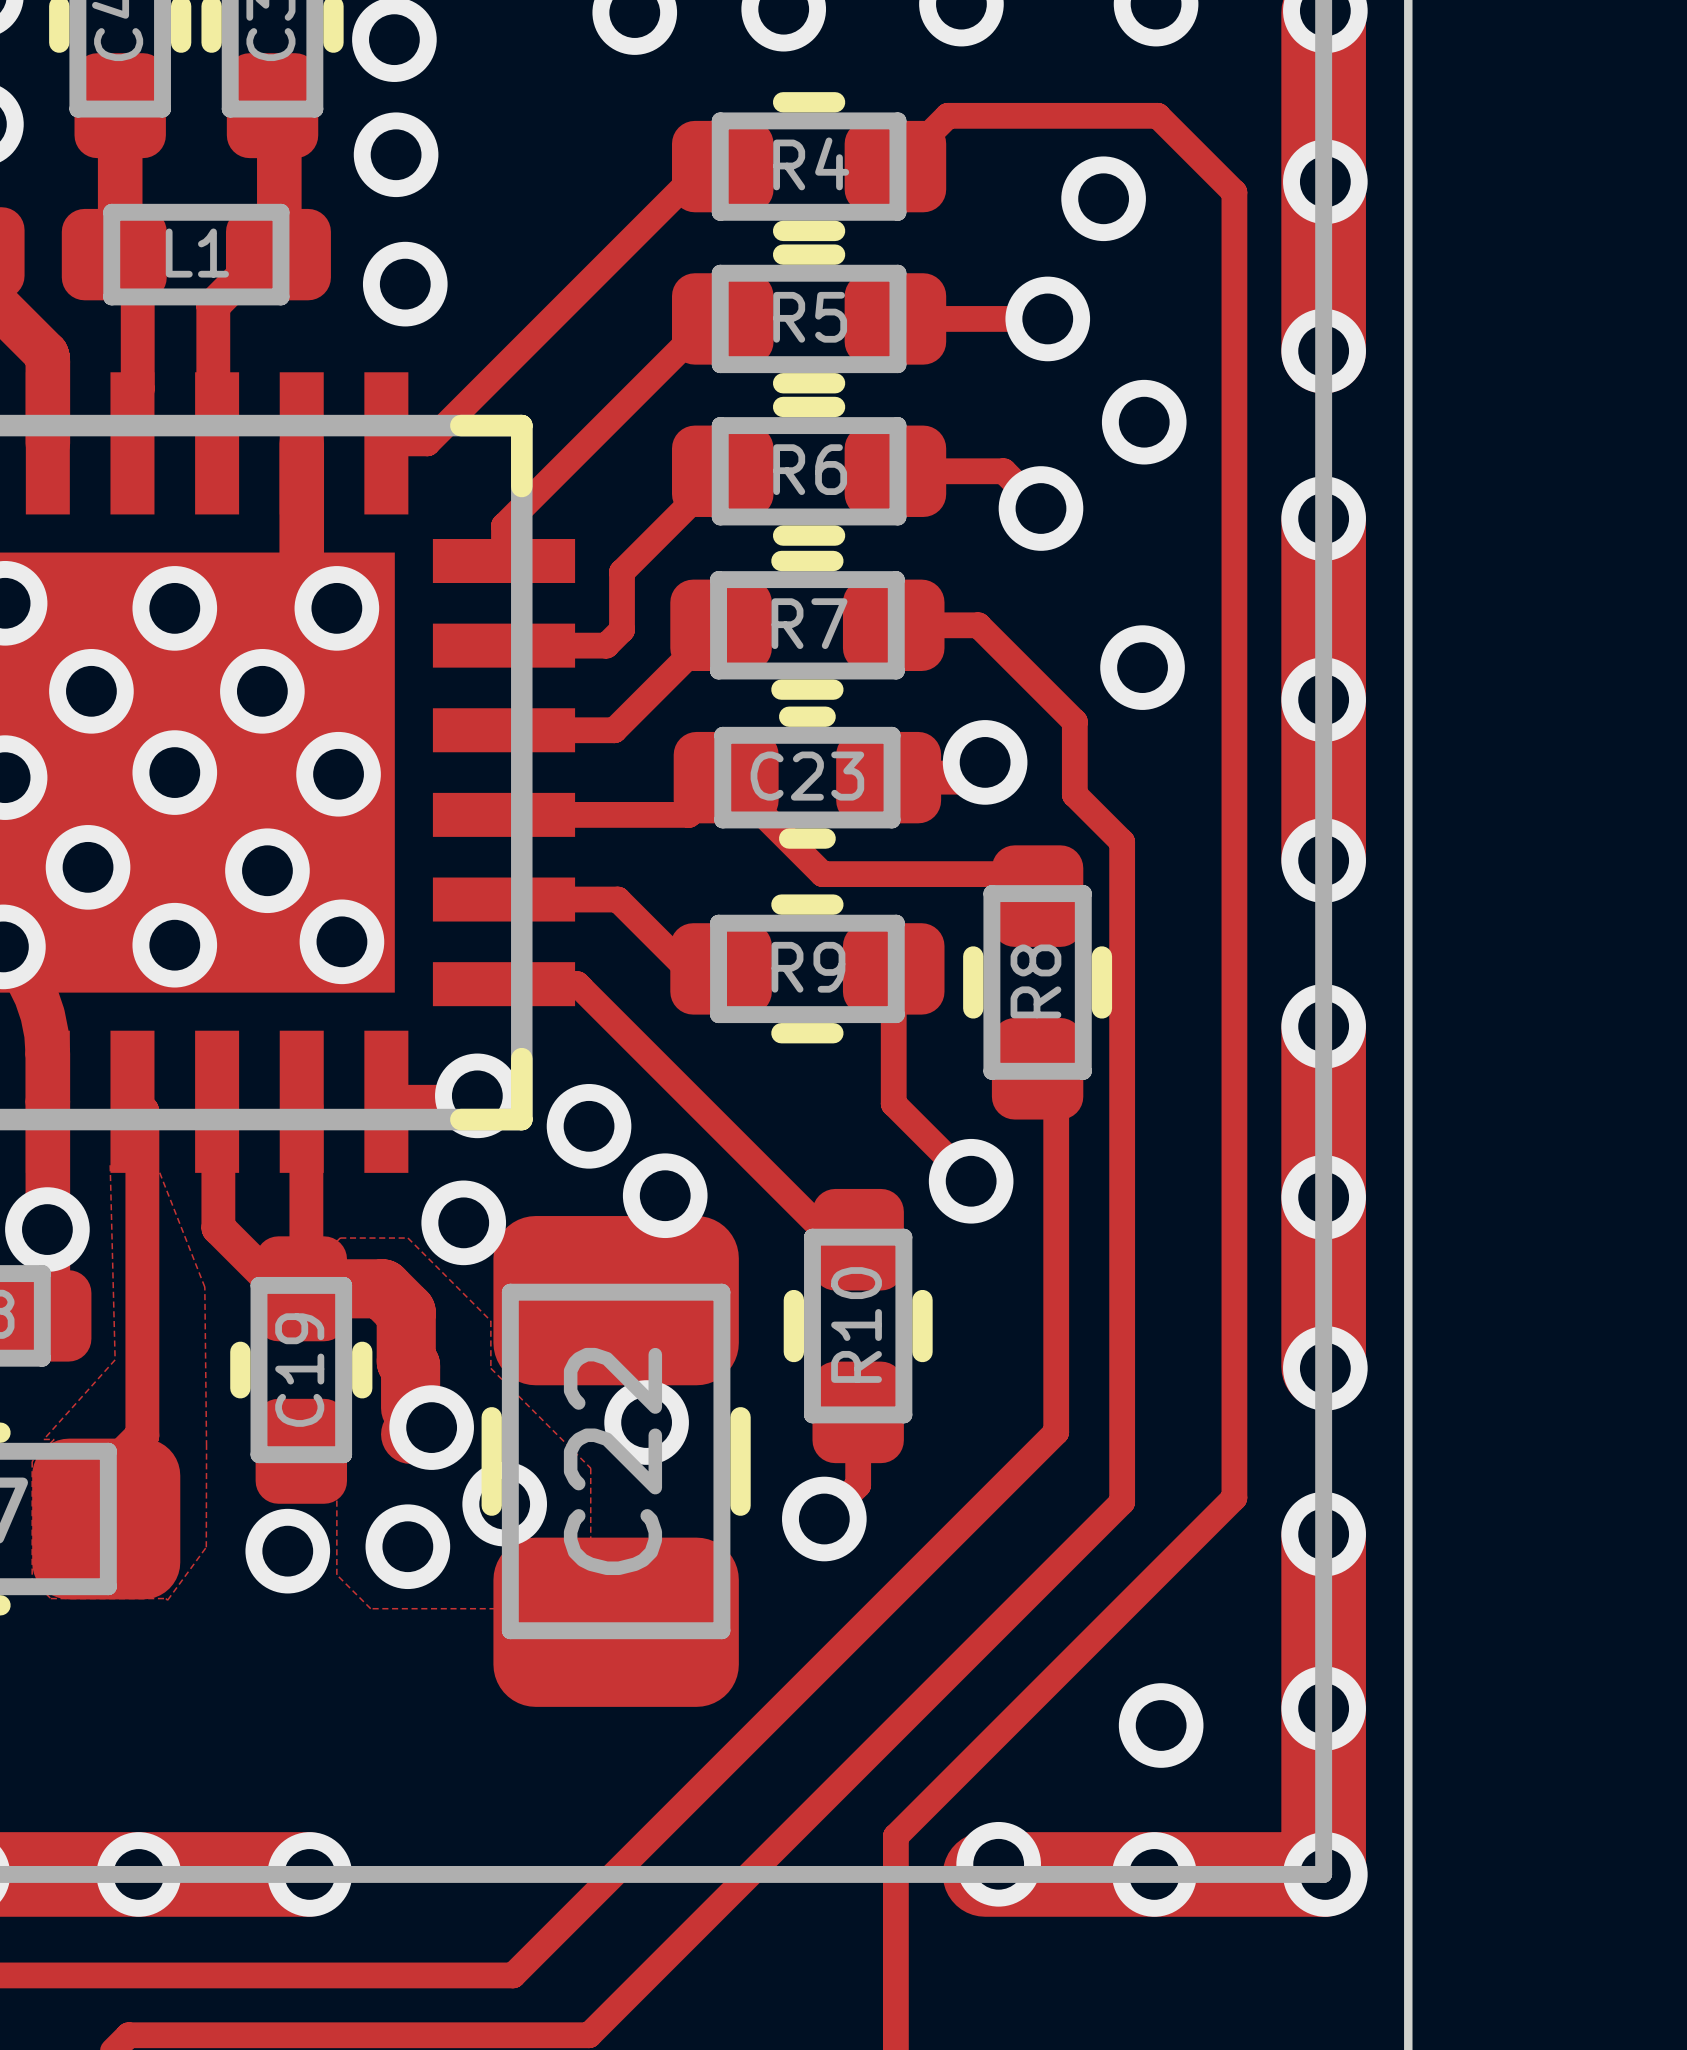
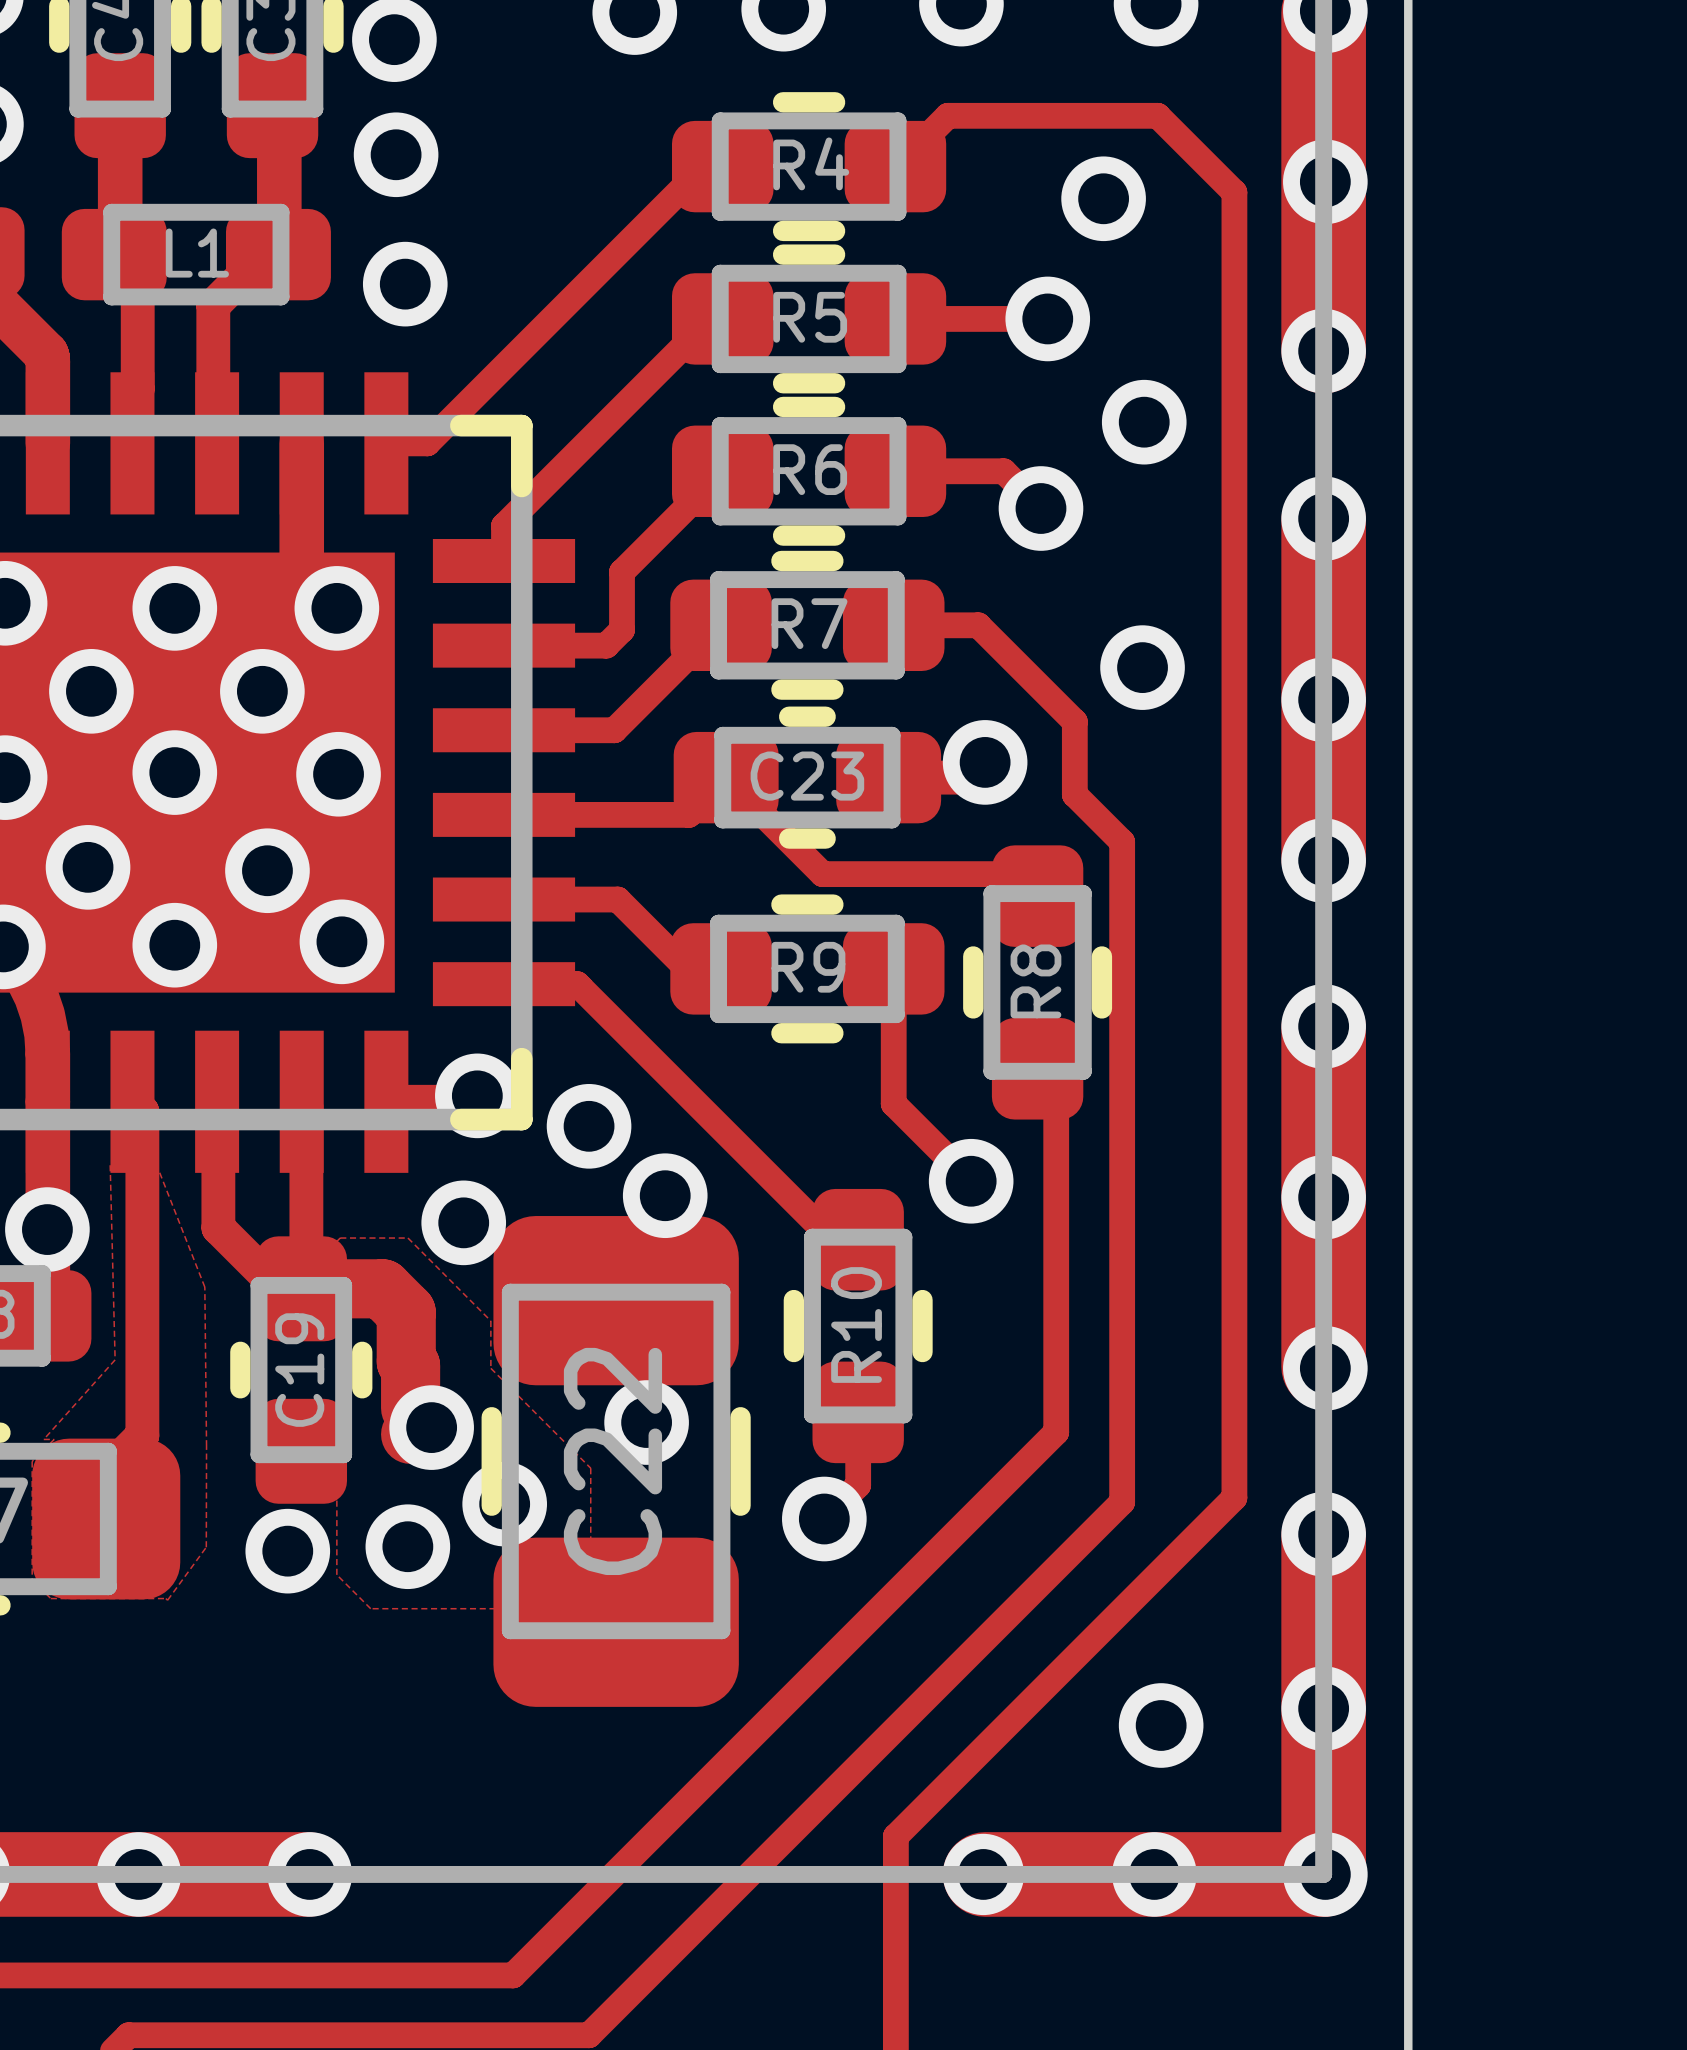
via position: (998, 1864) -> (983, 1874)

